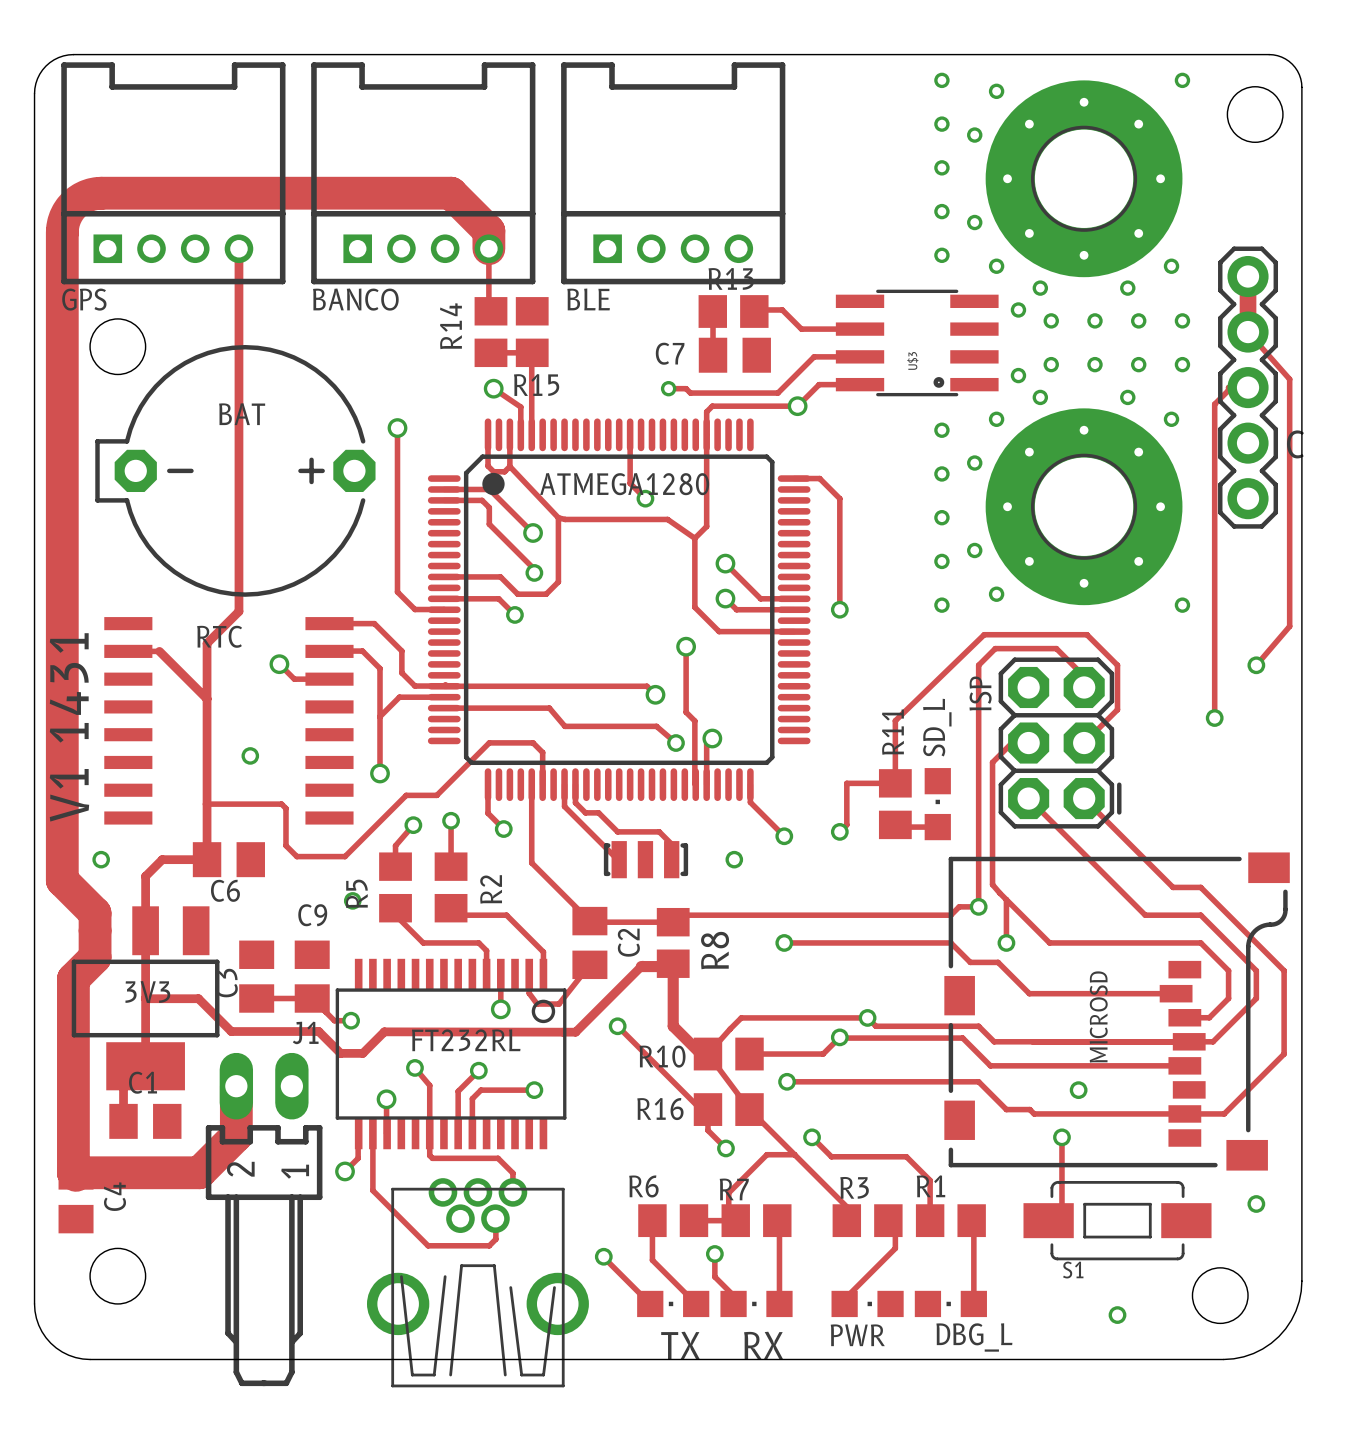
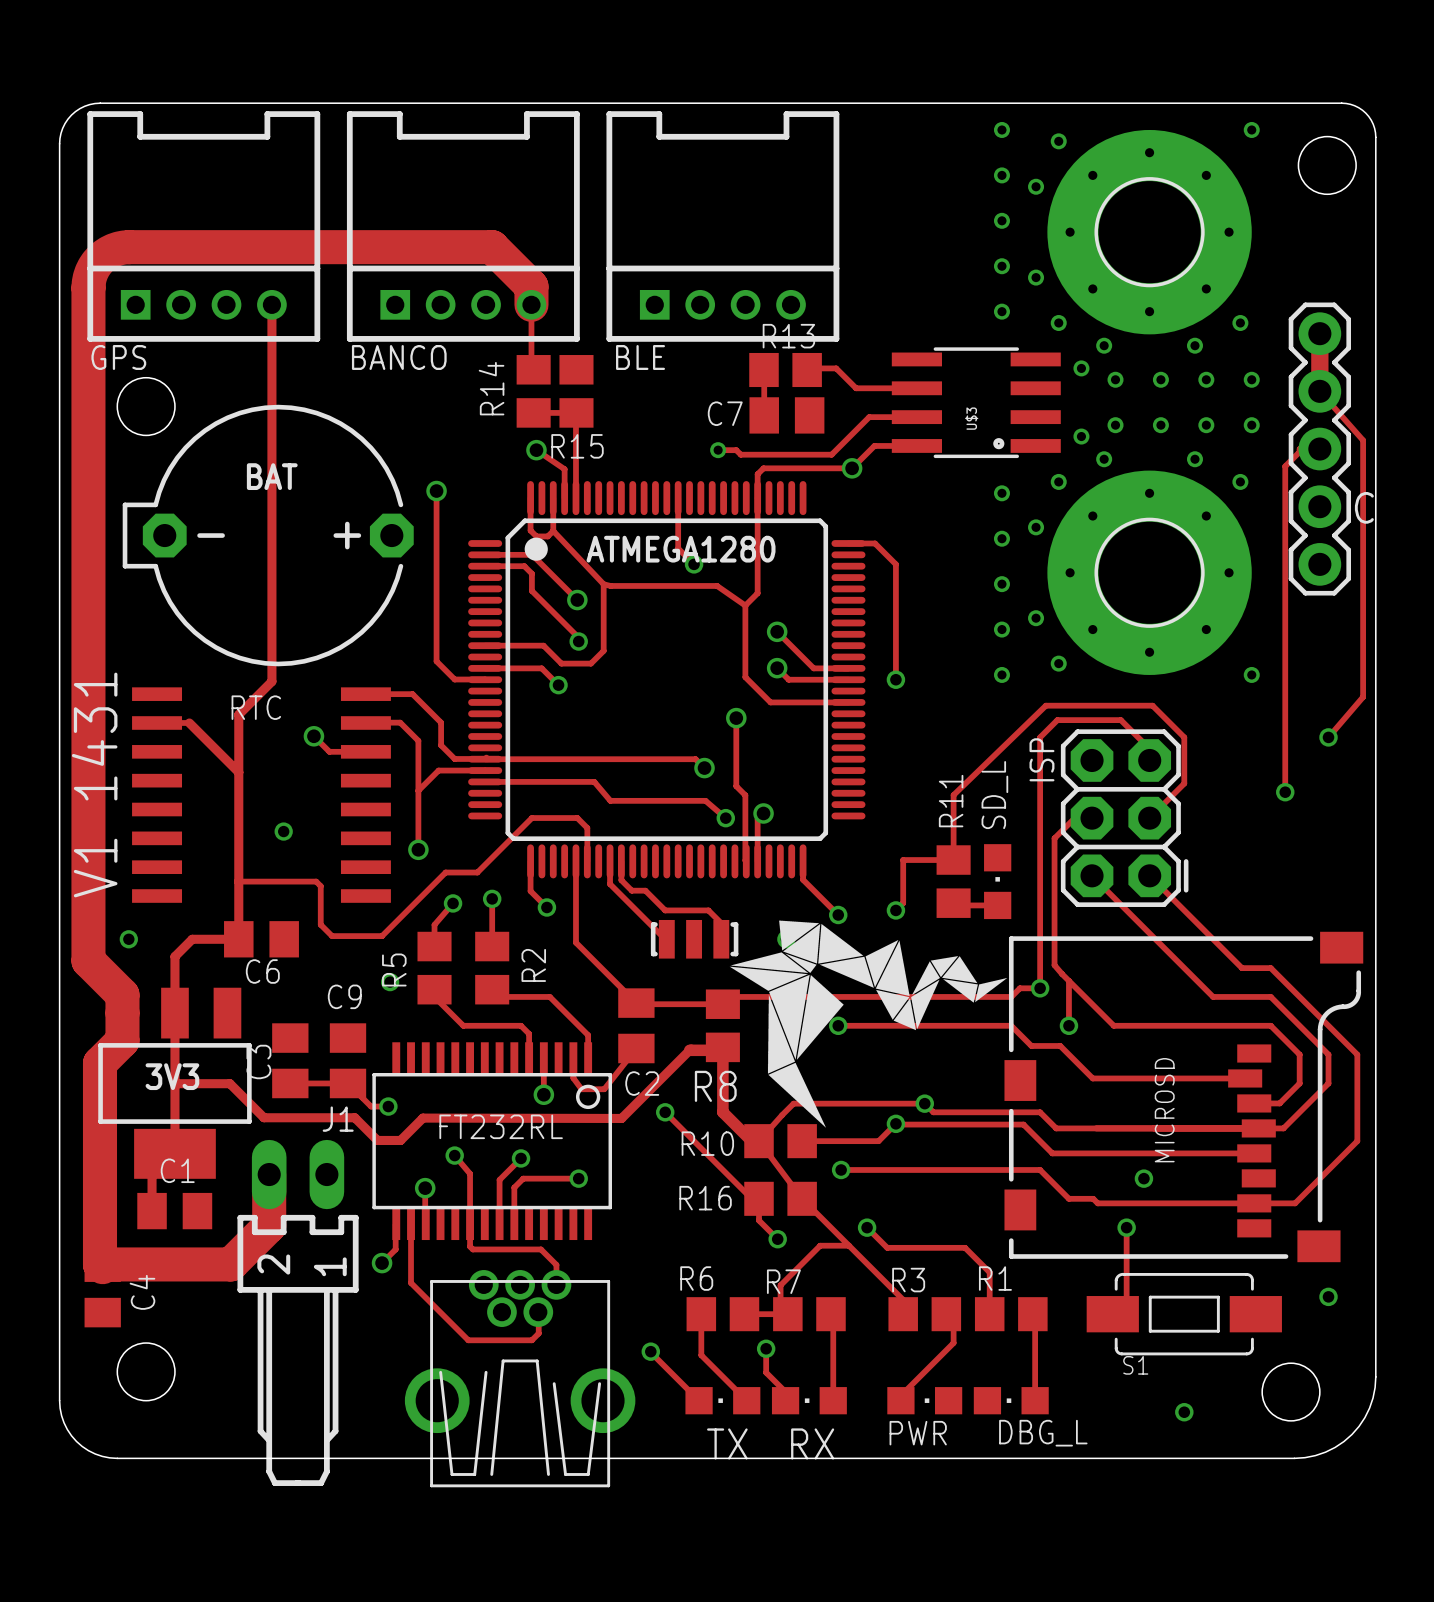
drawing: none -> [729, 920, 1008, 1128]
C2 name rotation: 0° (628, 942) -> 90° clockwise (642, 1083)
C2 name position: C2 (628, 942) -> C2 (642, 1083)
R8 name rotation: 0° (715, 950) -> 90° clockwise (715, 1086)

